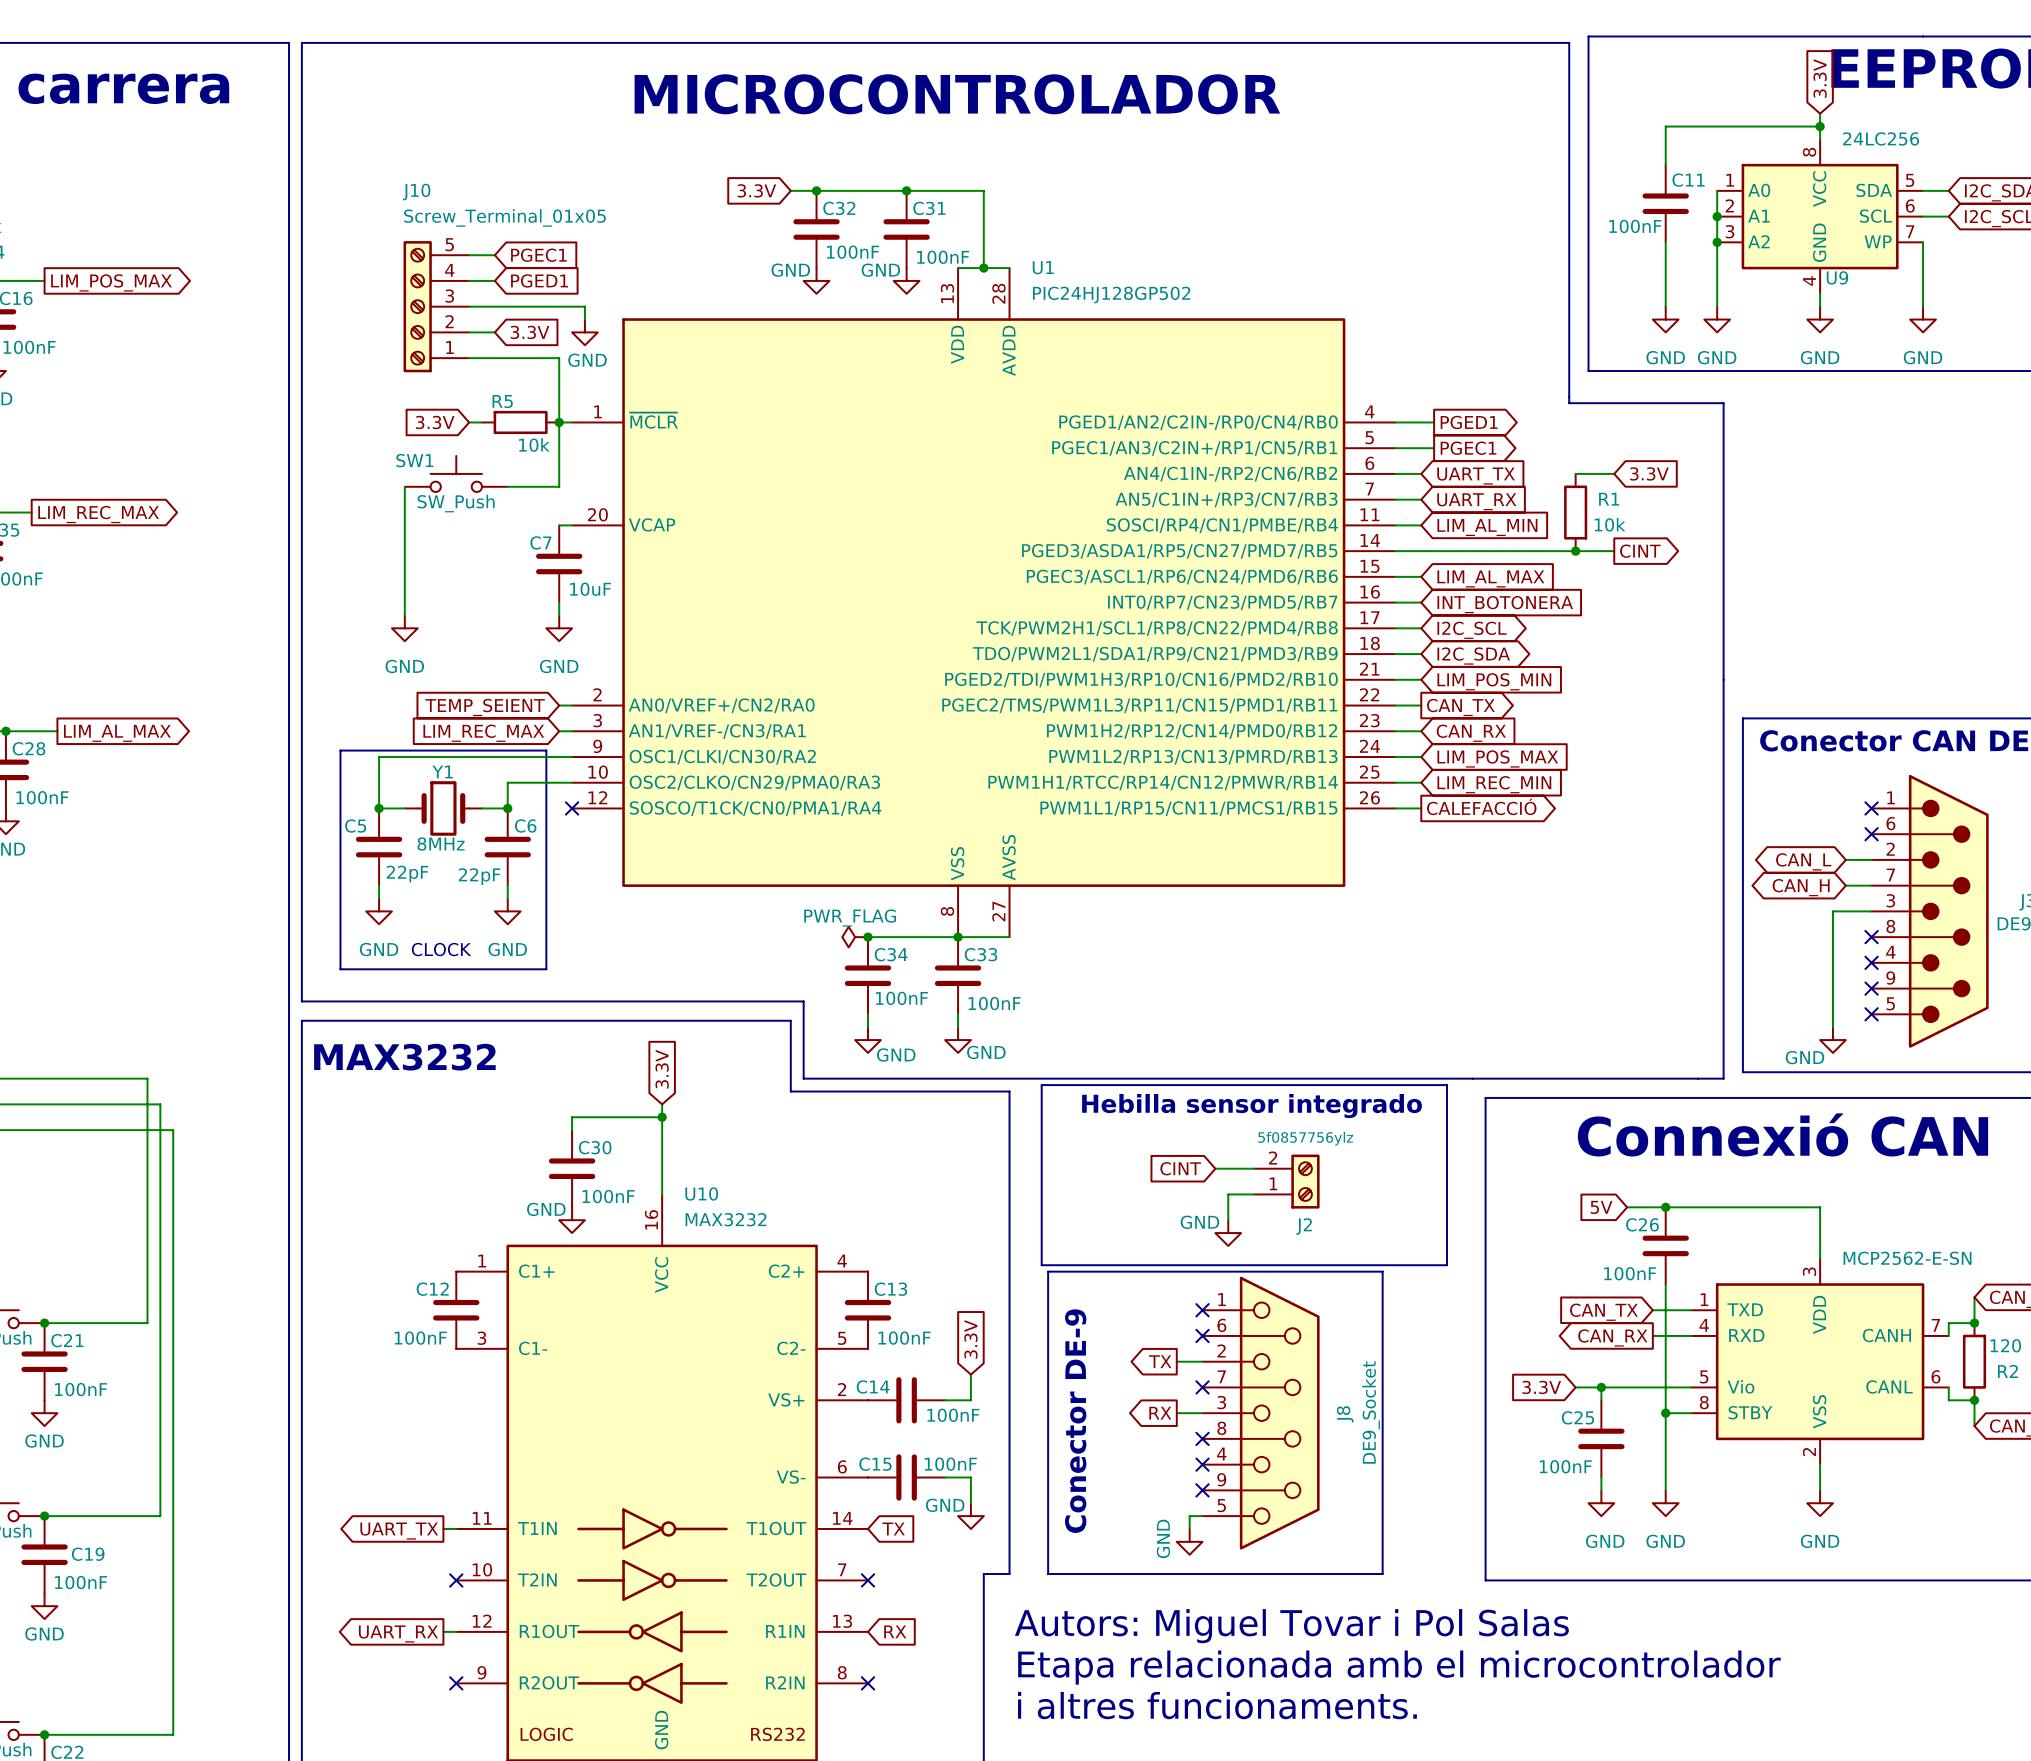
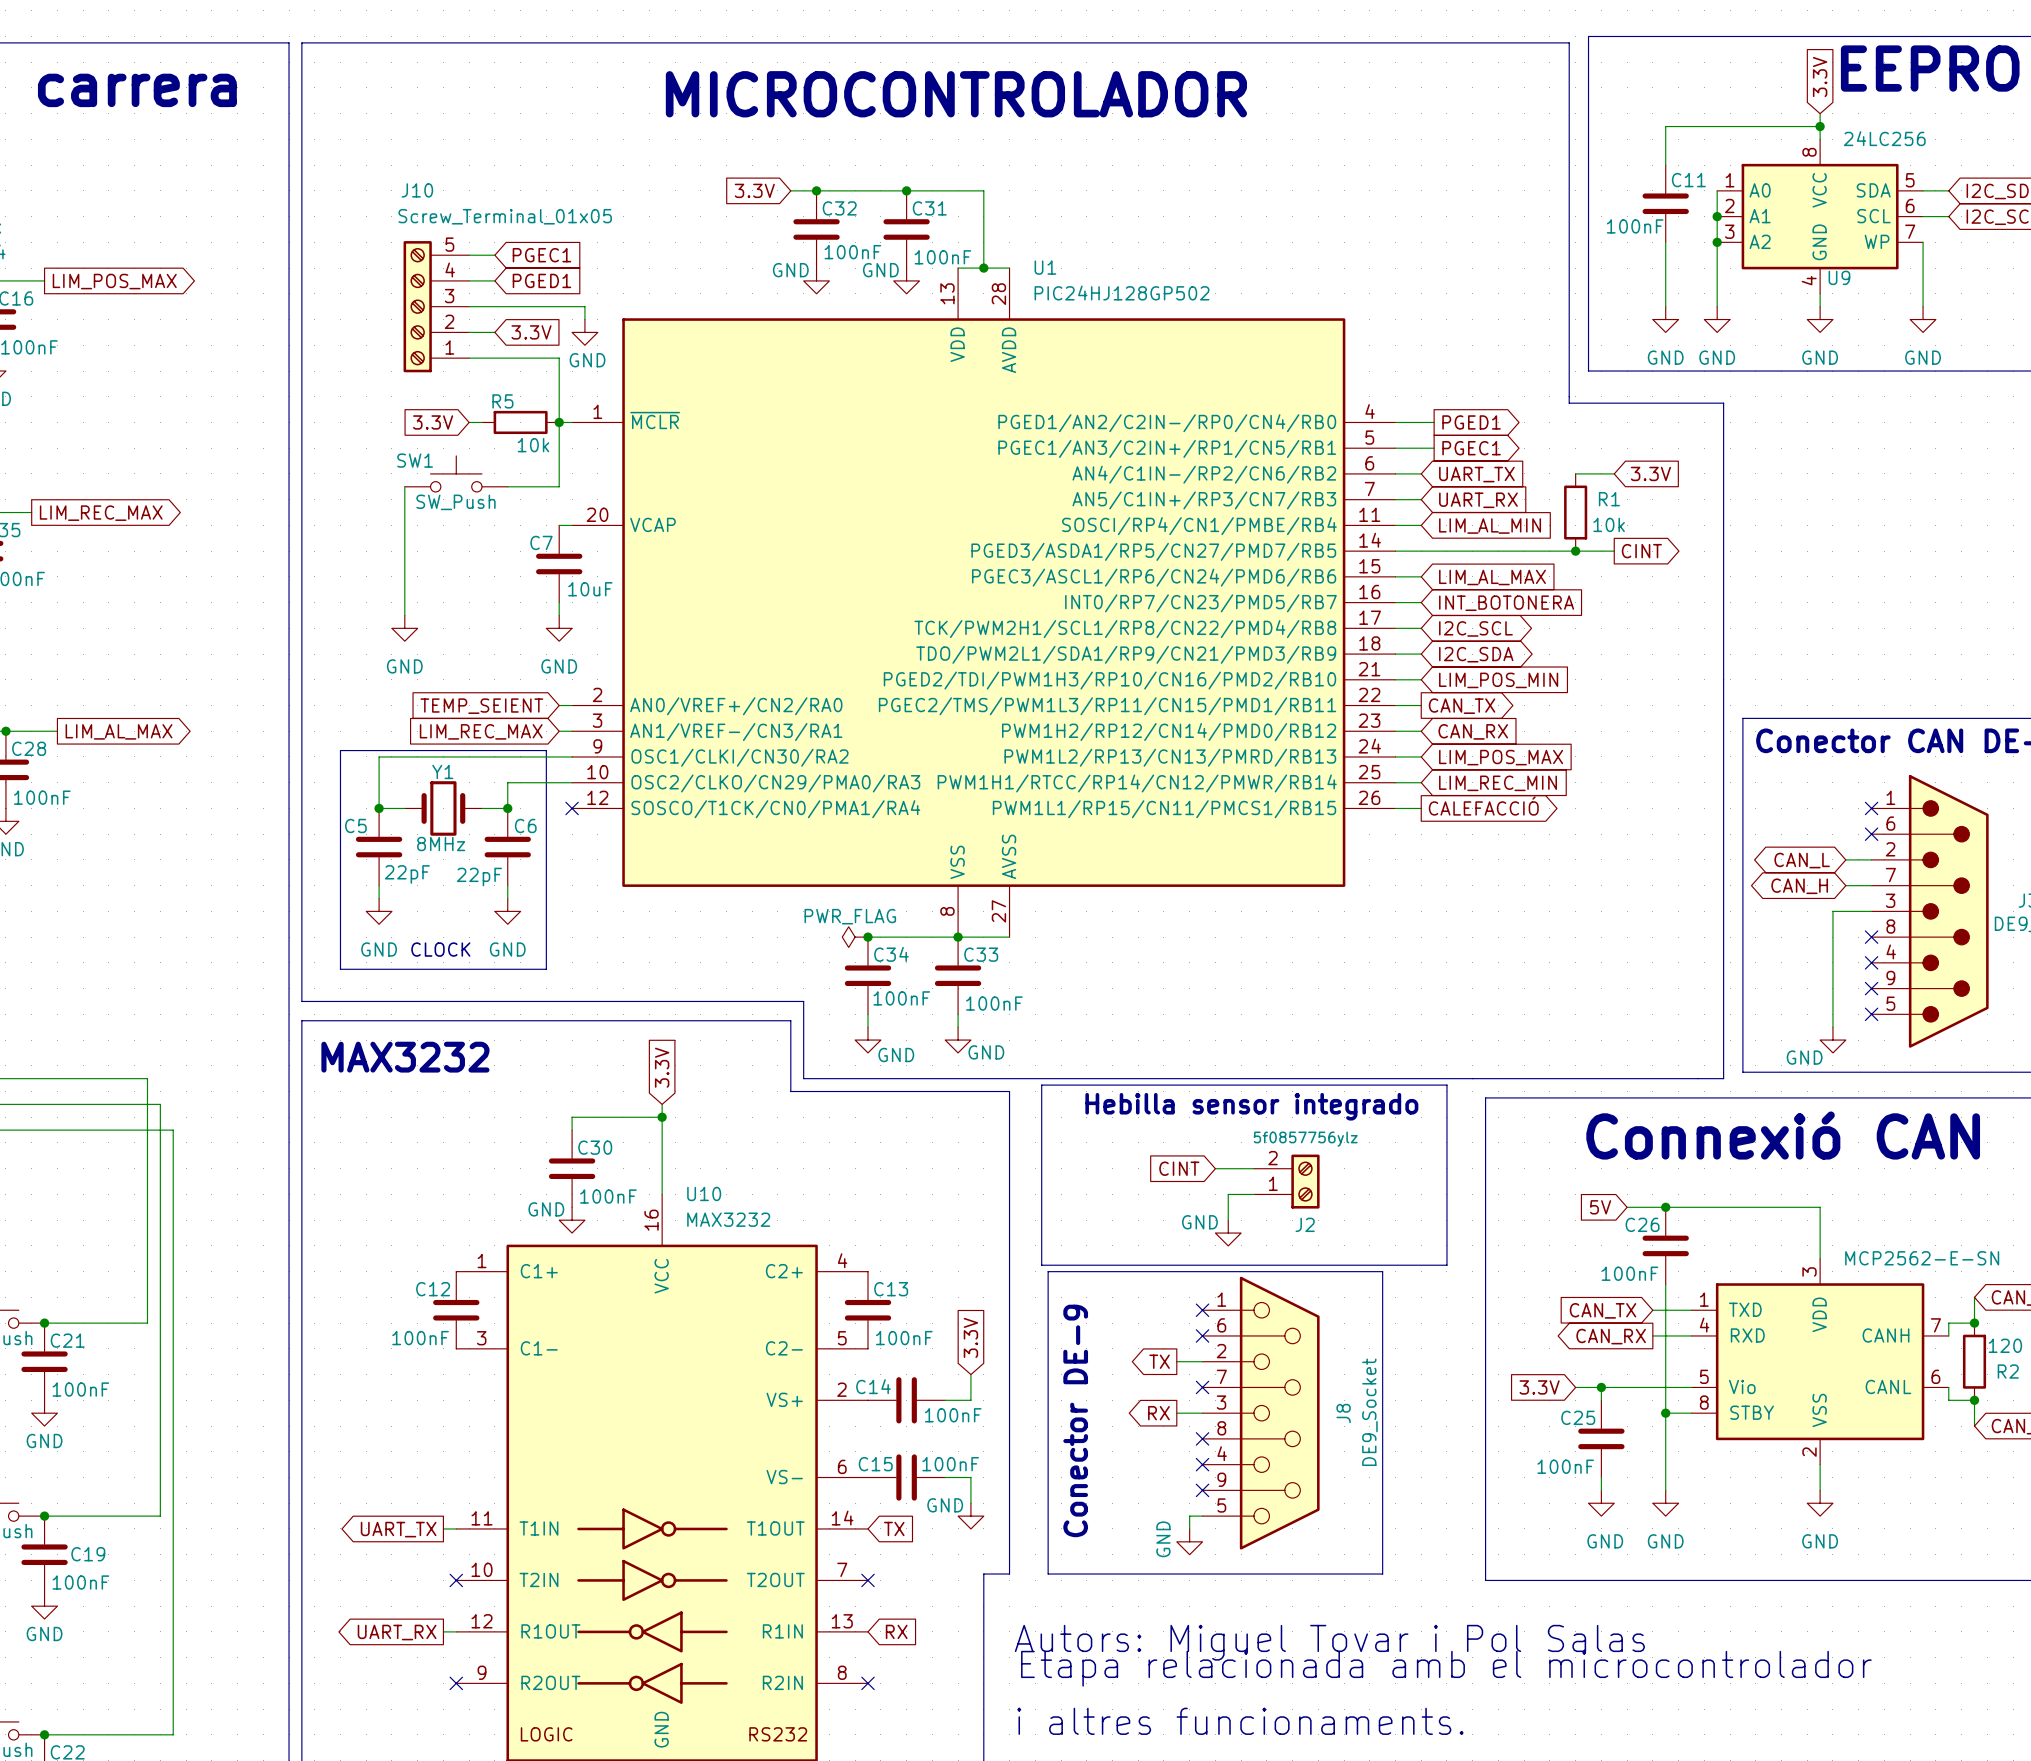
text position: Autors: Miguel Tovar i Pol Salas (1291, 1626) -> Autors: Miguel Tovar i Pol Salas (1329, 1642)
text position: i altres funcionaments. (1217, 1705) -> i altres funcionaments. (1240, 1721)

